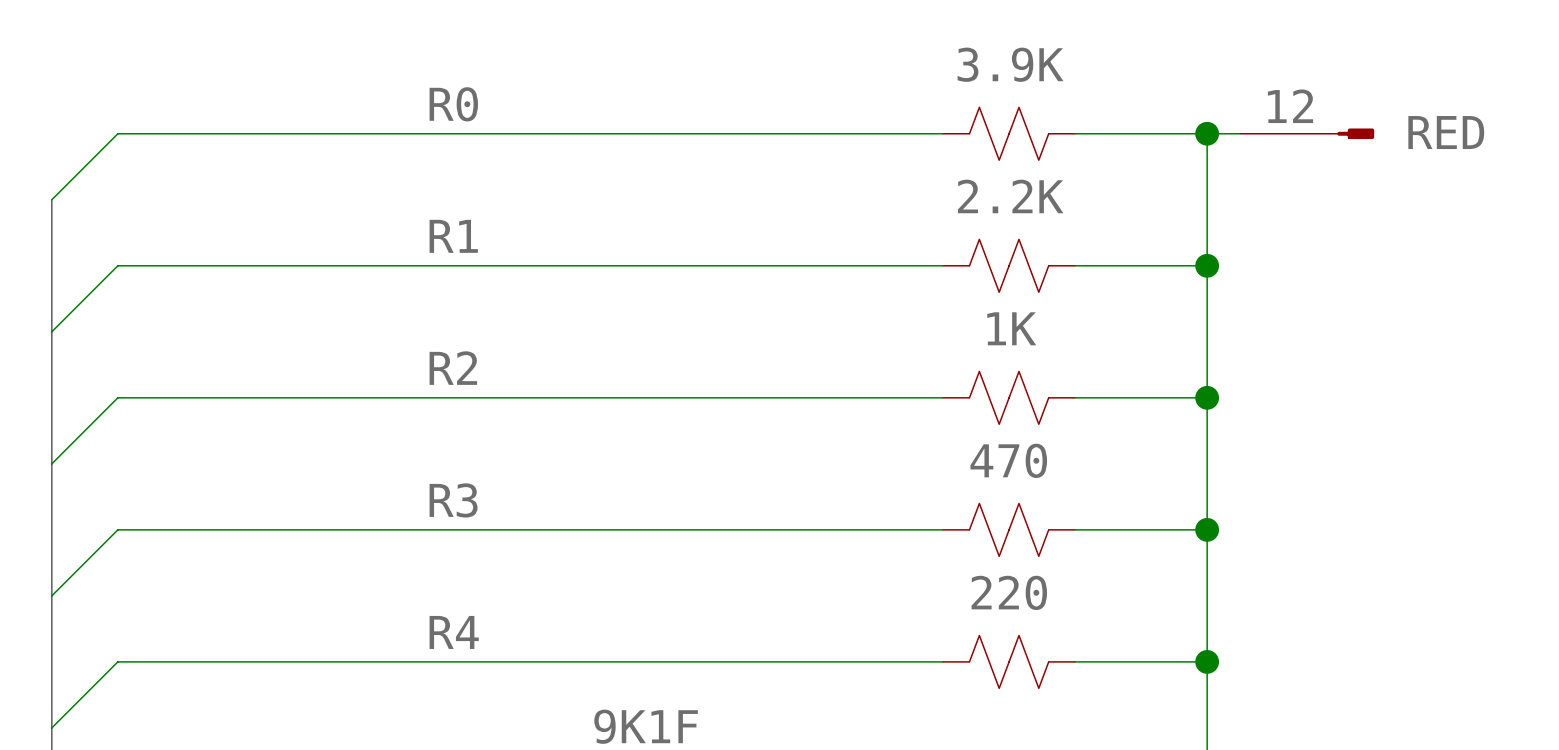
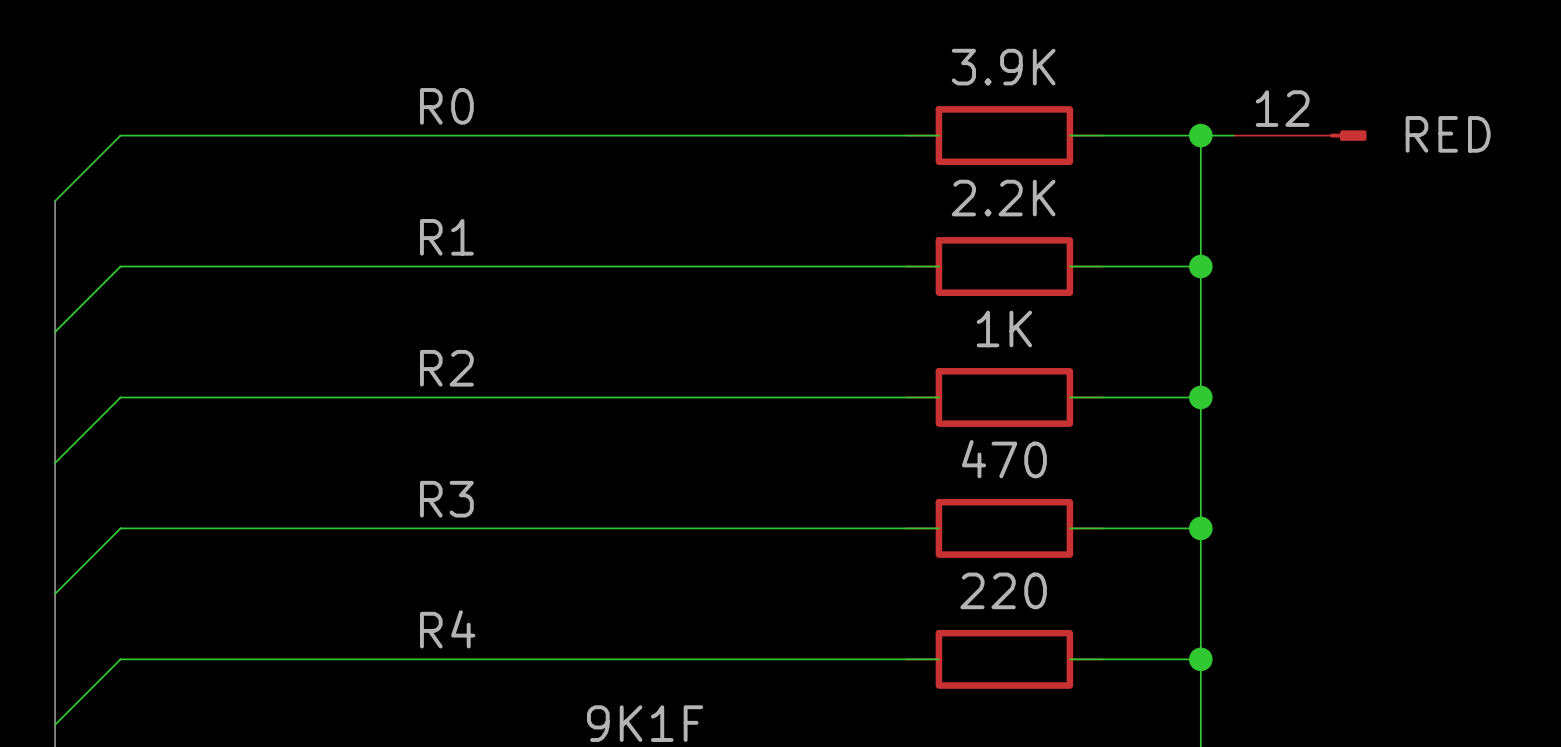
part symbol: [943, 107, 1076, 161] -> [906, 106, 1103, 166]
part symbol: [943, 239, 1076, 293] -> [906, 237, 1103, 296]
part symbol: [943, 371, 1076, 425] -> [906, 368, 1103, 427]
part symbol: [943, 503, 1076, 557] -> [906, 498, 1103, 558]
part symbol: [943, 635, 1076, 689] -> [906, 629, 1103, 689]

